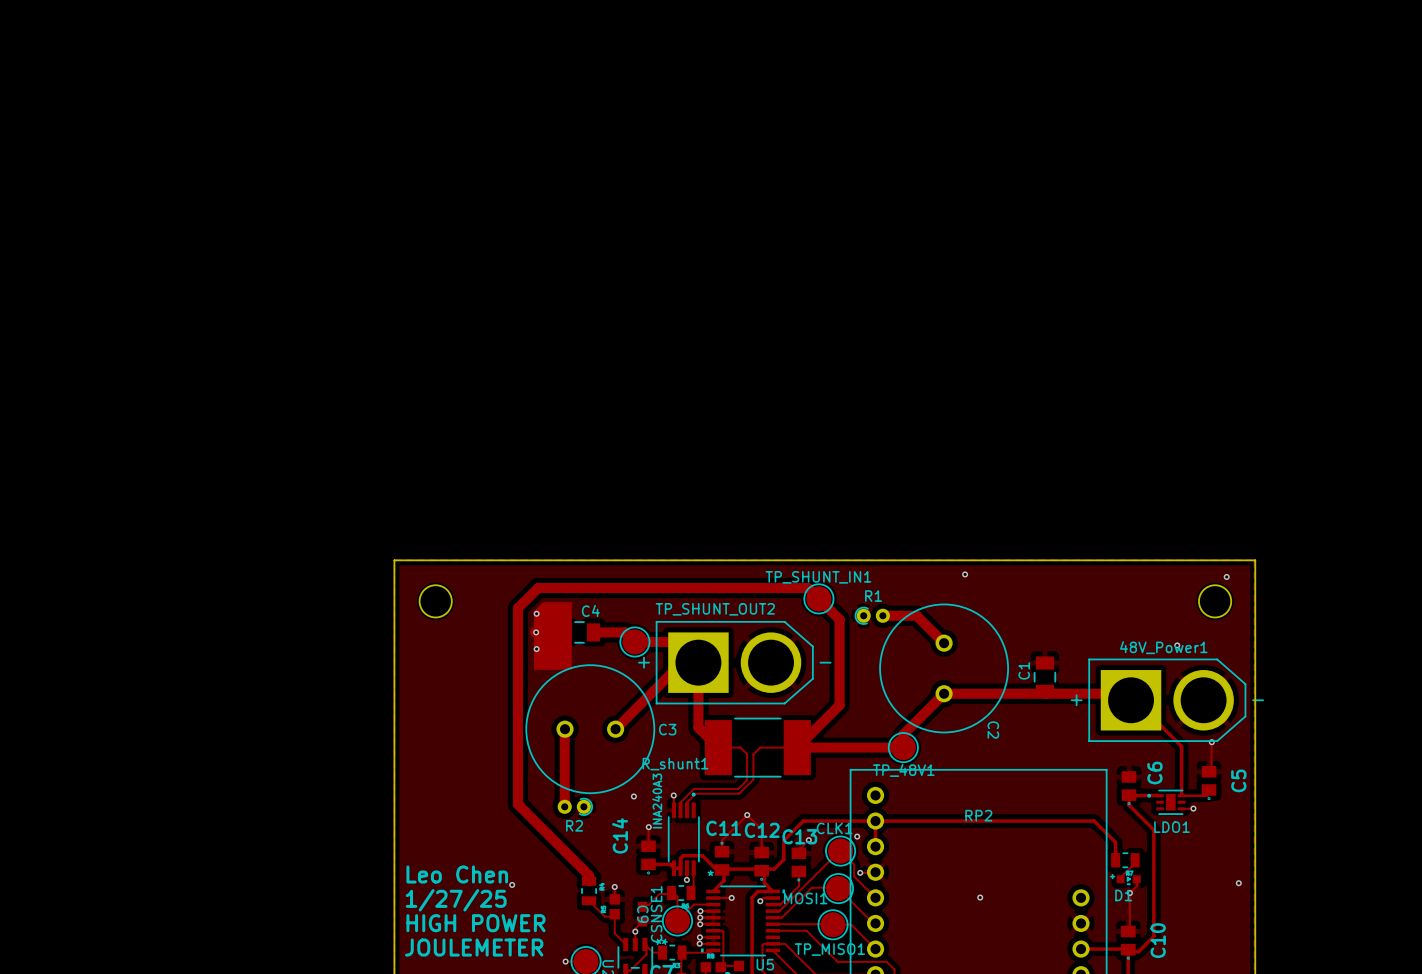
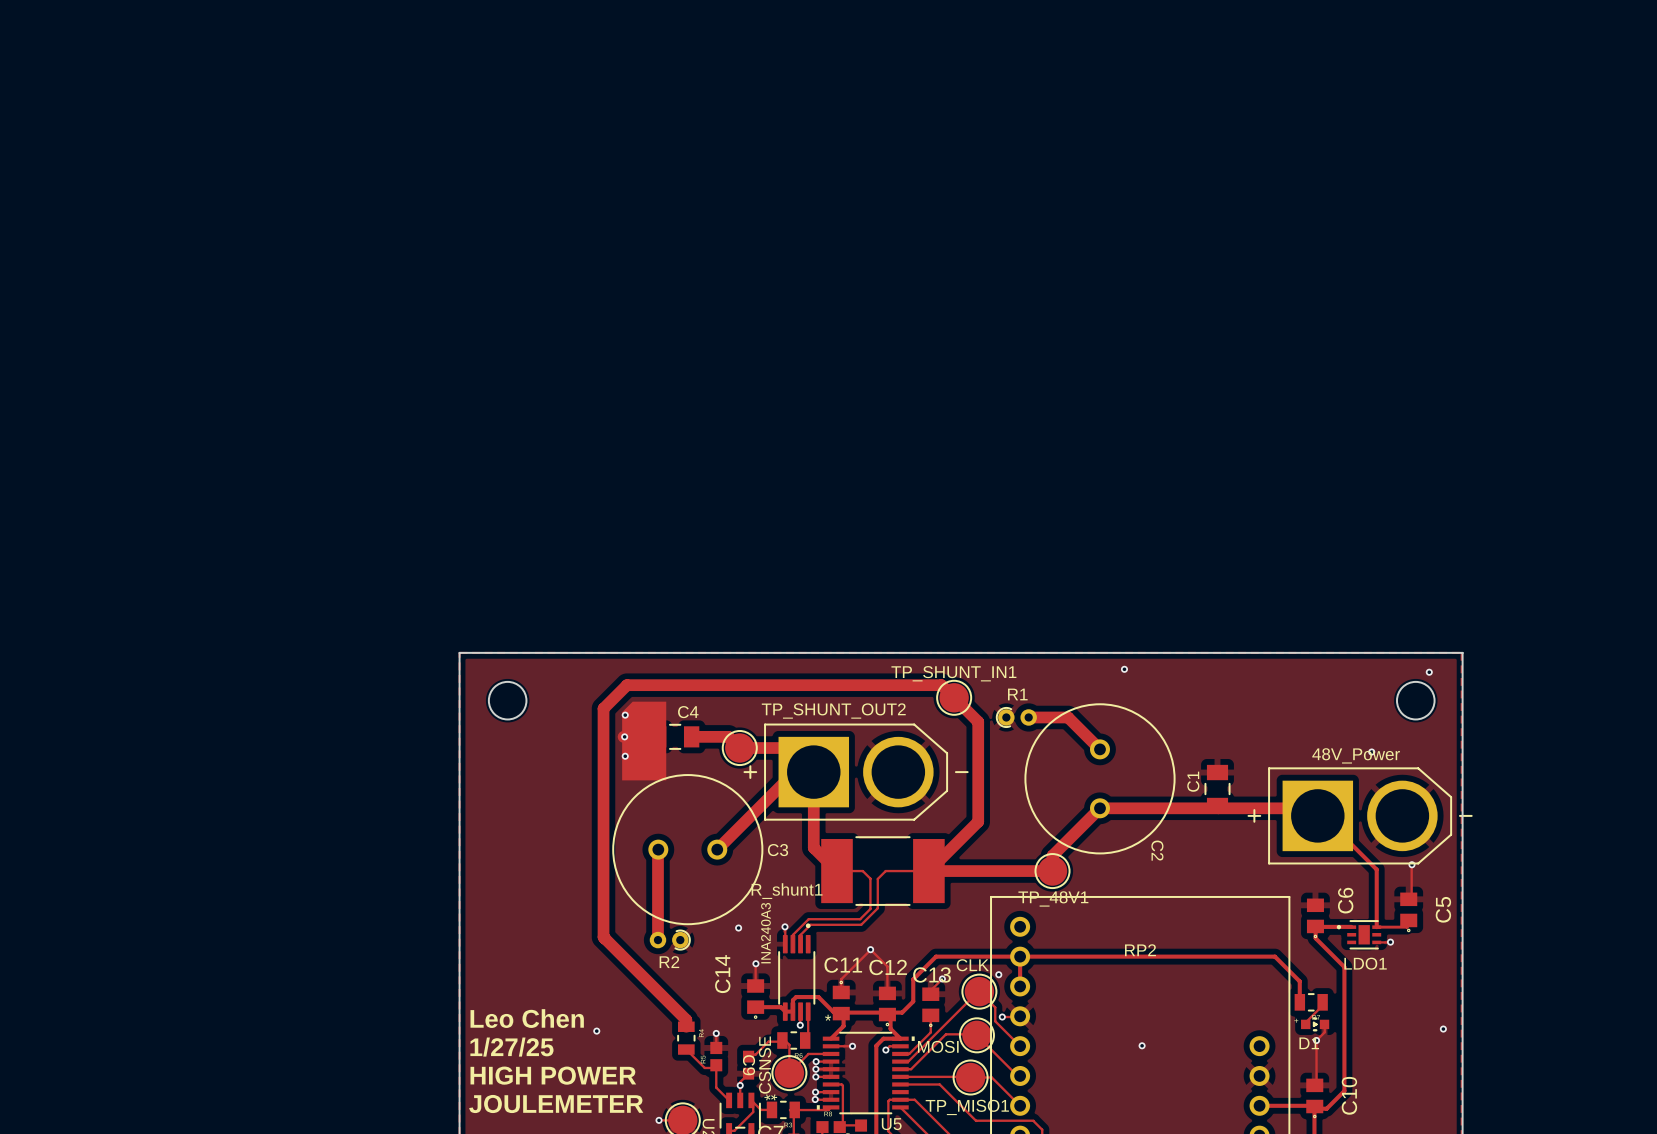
48V_Power1 name: 48V_Power1 (1163, 647) -> 48V_Power (1356, 755)
CLK1 name: CLK1 (834, 828) -> CLK (972, 965)
MOSI1 name: MOSI1 (805, 898) -> MOSI (938, 1046)
CSNSE1 name: CSNSE1 (656, 914) -> CSNSE (765, 1065)

